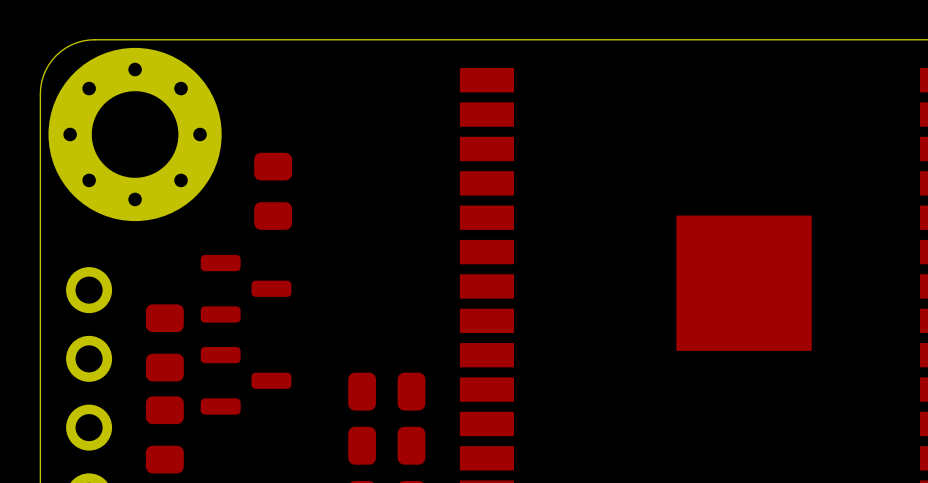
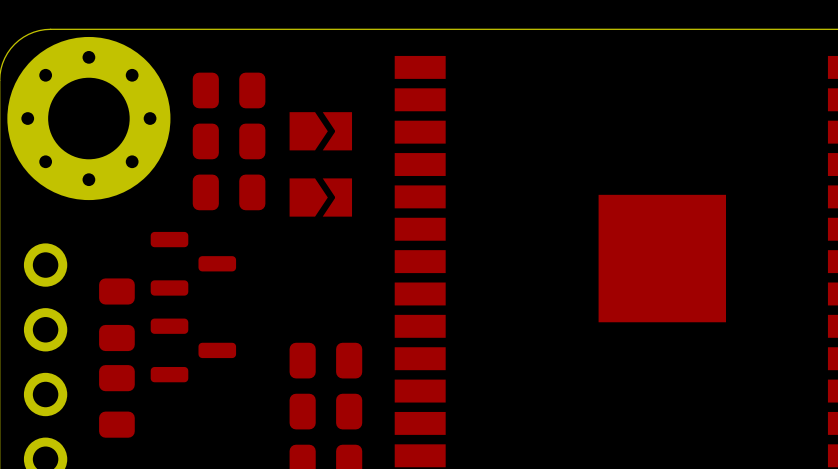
part: none -> (229, 90)
part: none -> (320, 131)
part: none -> (229, 141)
part: (273, 191) -> none
part: none -> (229, 192)
part: none -> (320, 197)

